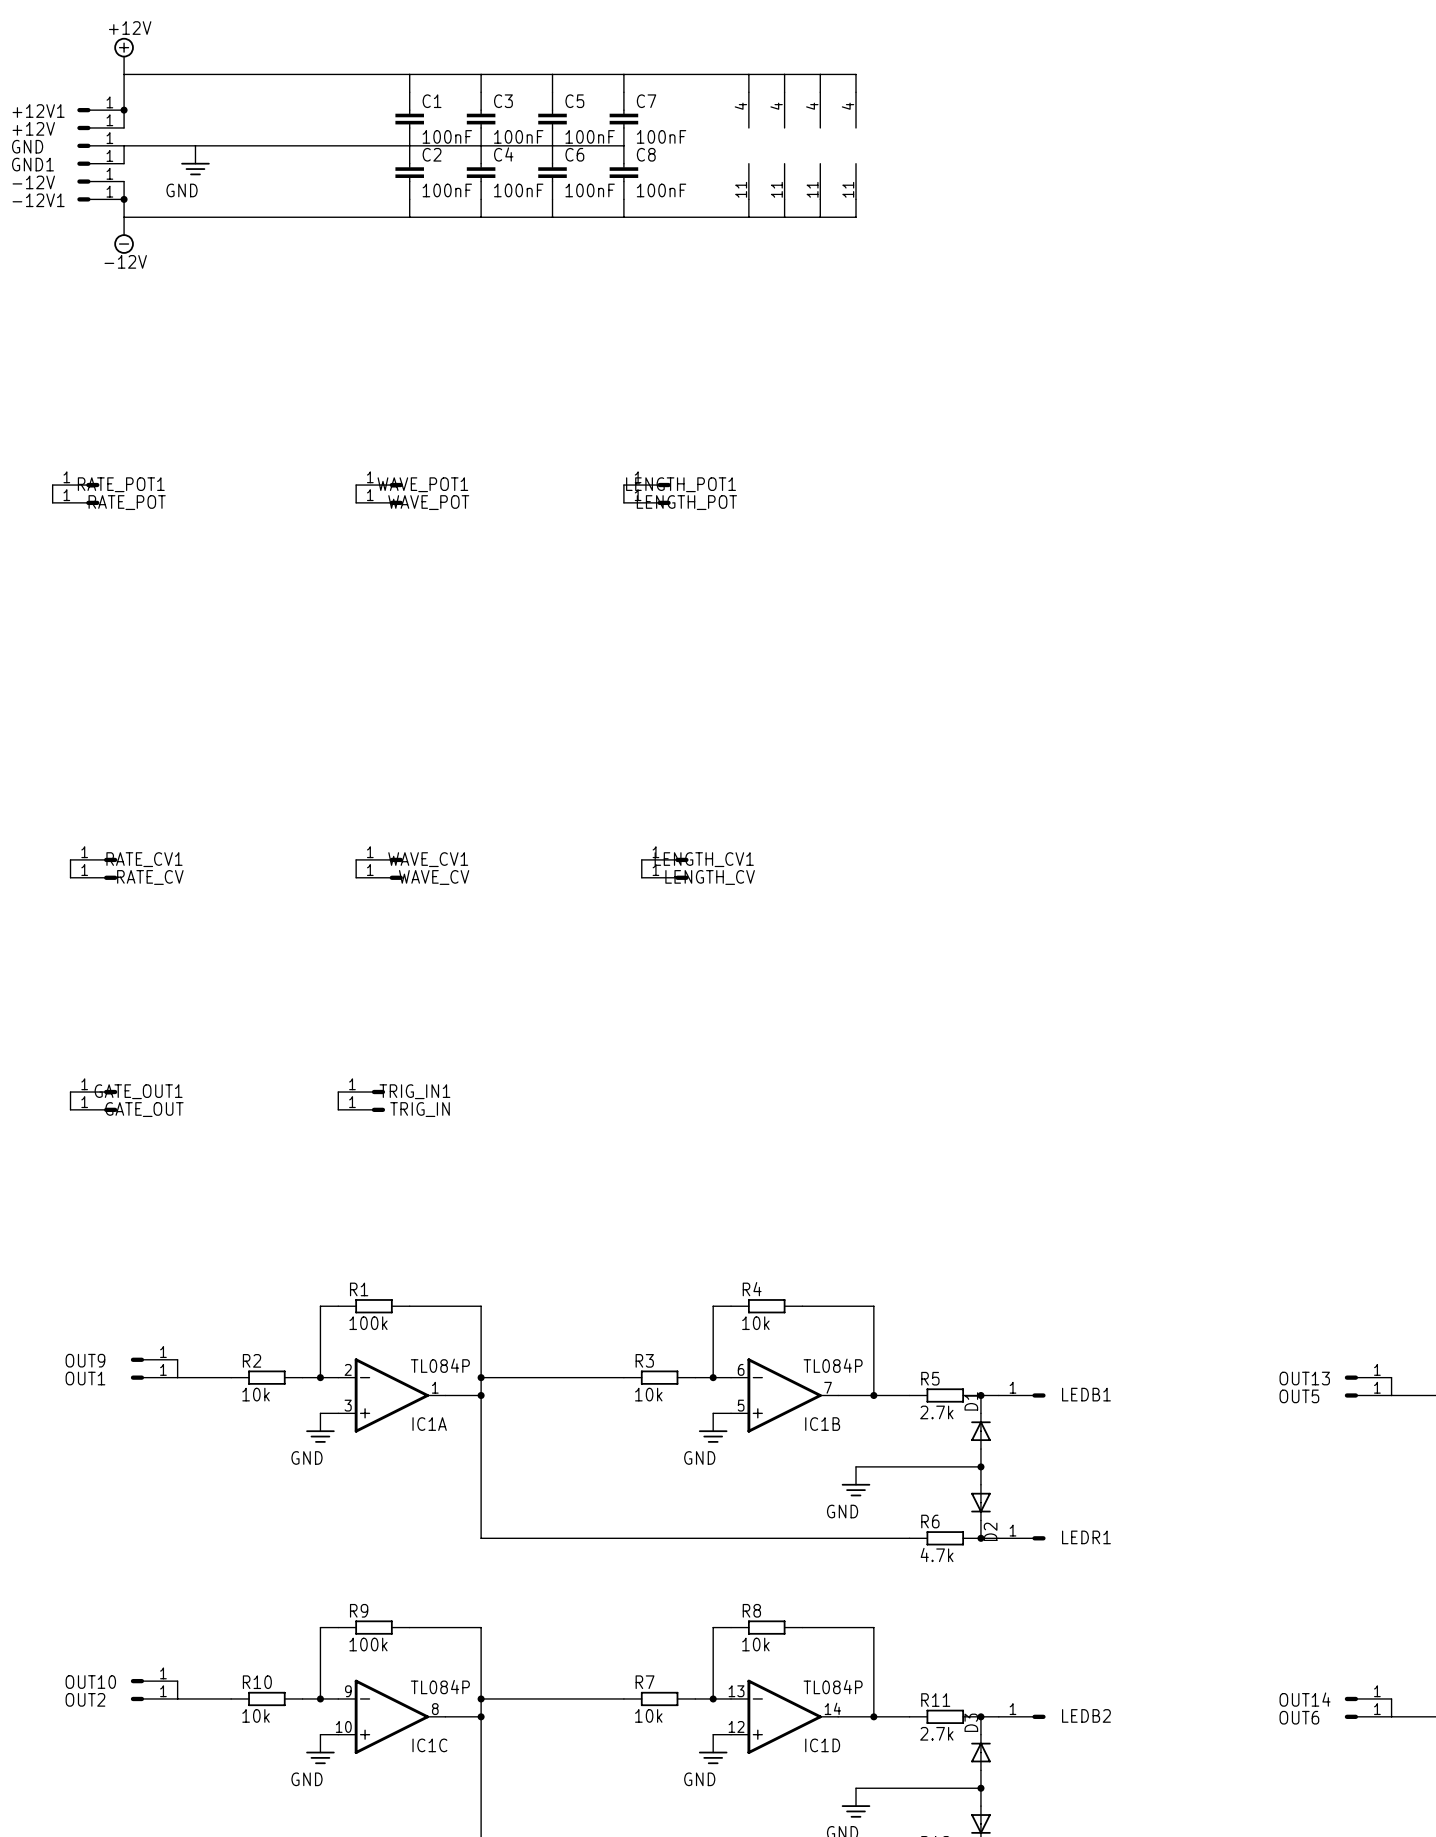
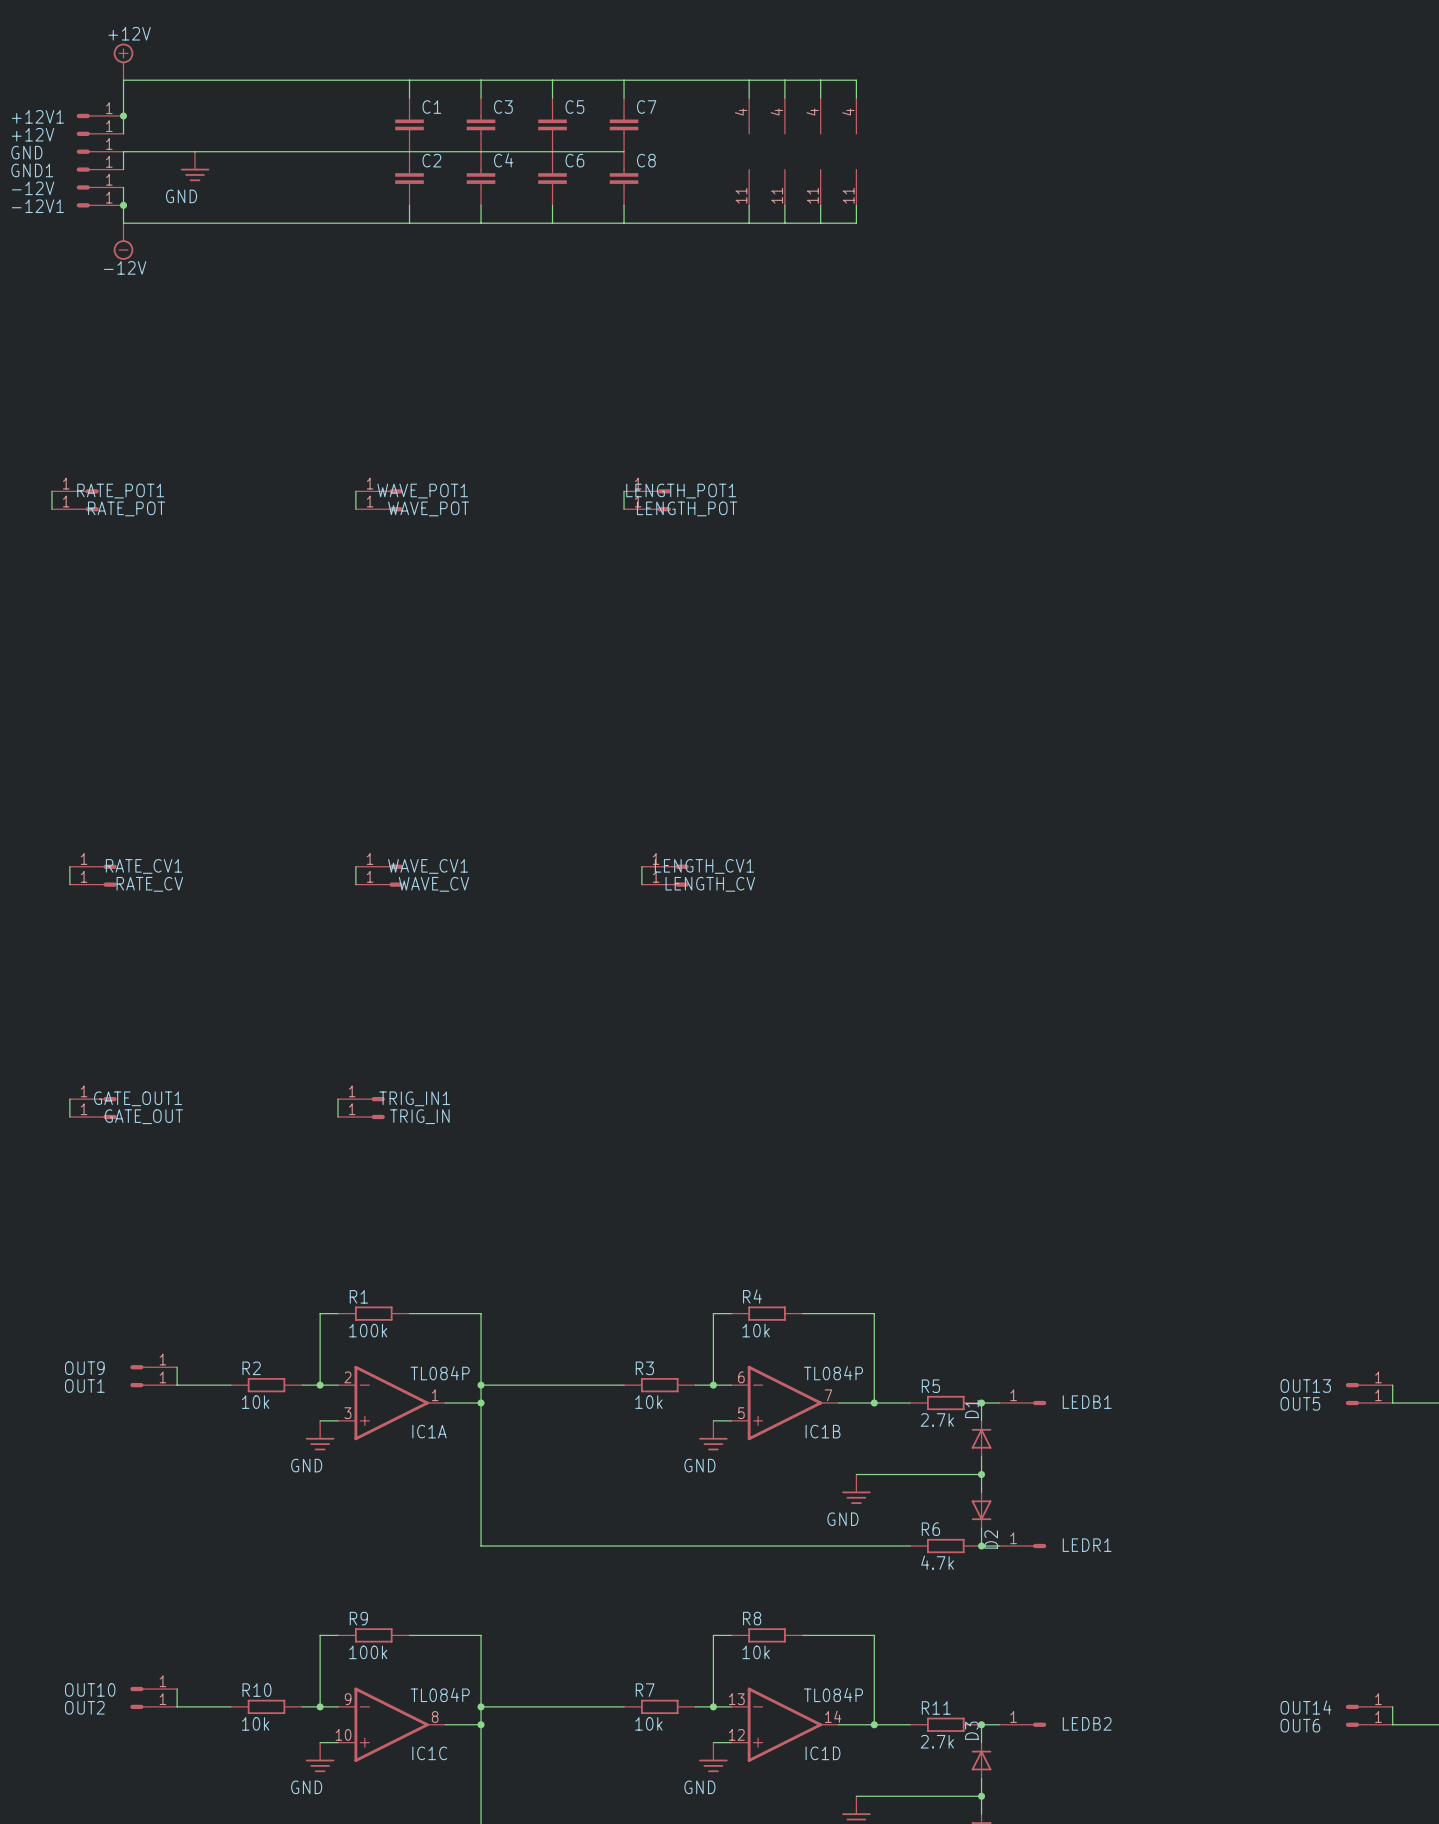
C1 value: 100nF (447, 136) -> none
C3 value: 100nF (518, 136) -> none
C5 value: 100nF (590, 136) -> none
C7 value: 100nF (661, 136) -> none
C2 value: 100nF (447, 190) -> none
C4 value: 100nF (518, 190) -> none
C6 value: 100nF (590, 190) -> none
C8 value: 100nF (661, 190) -> none

